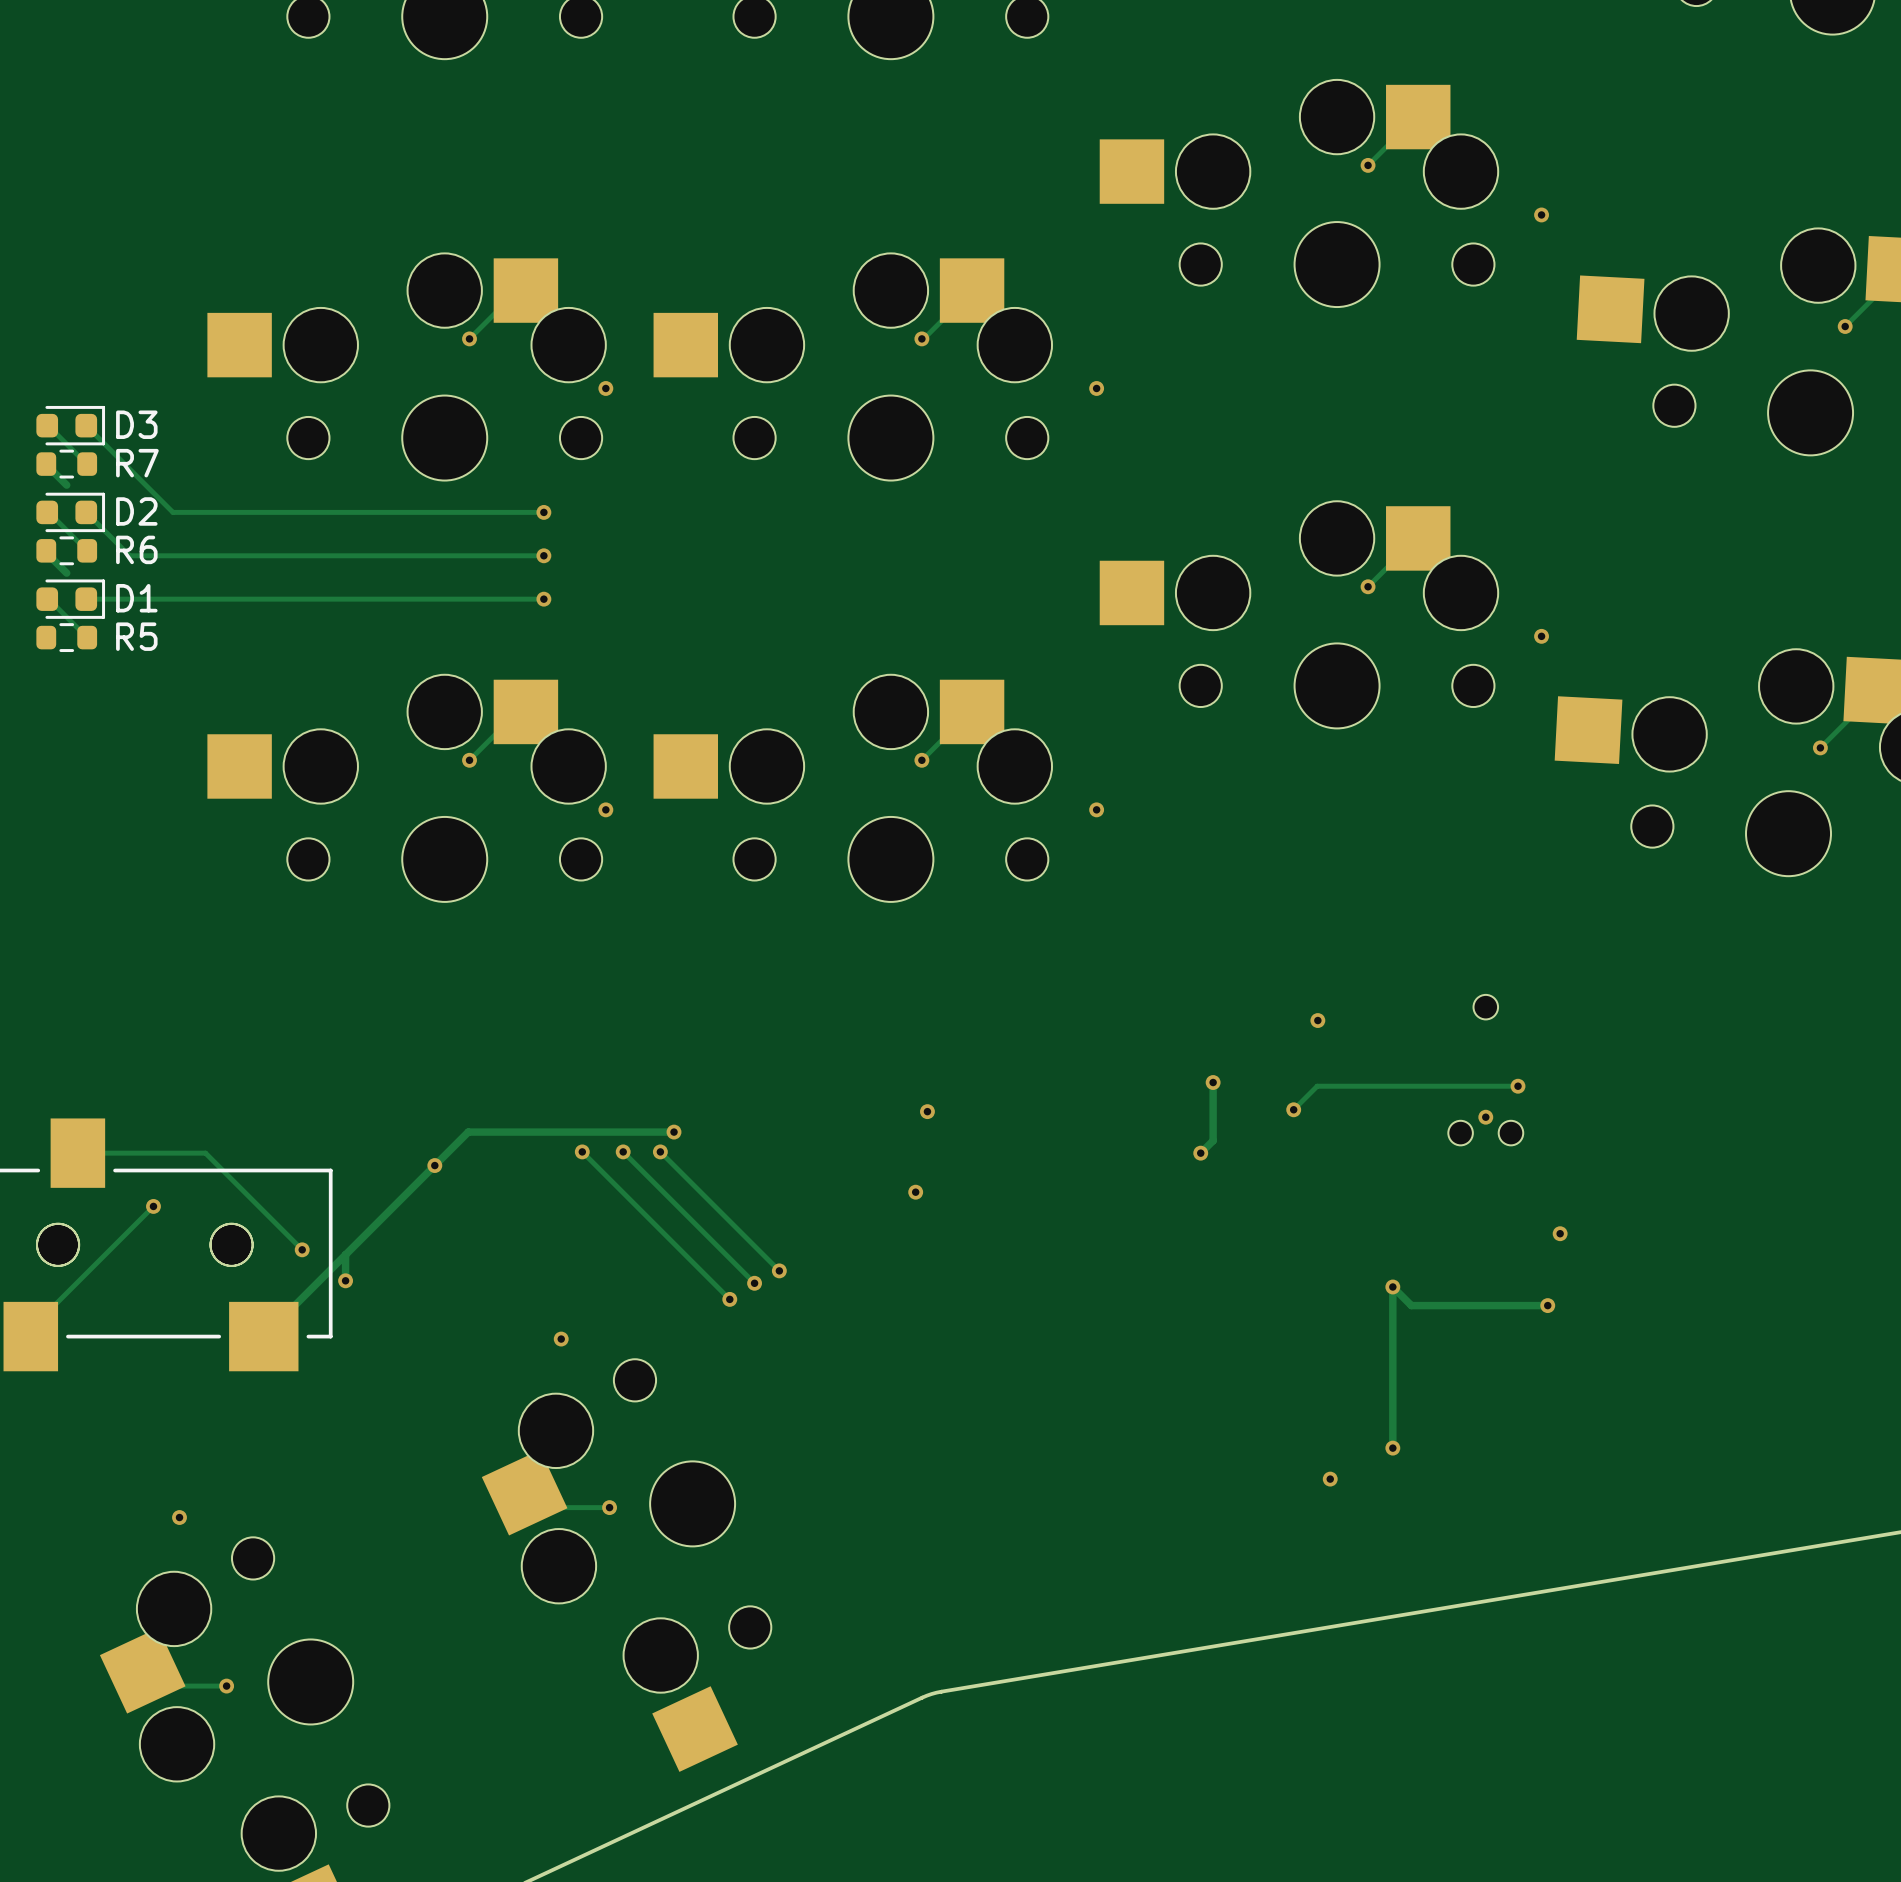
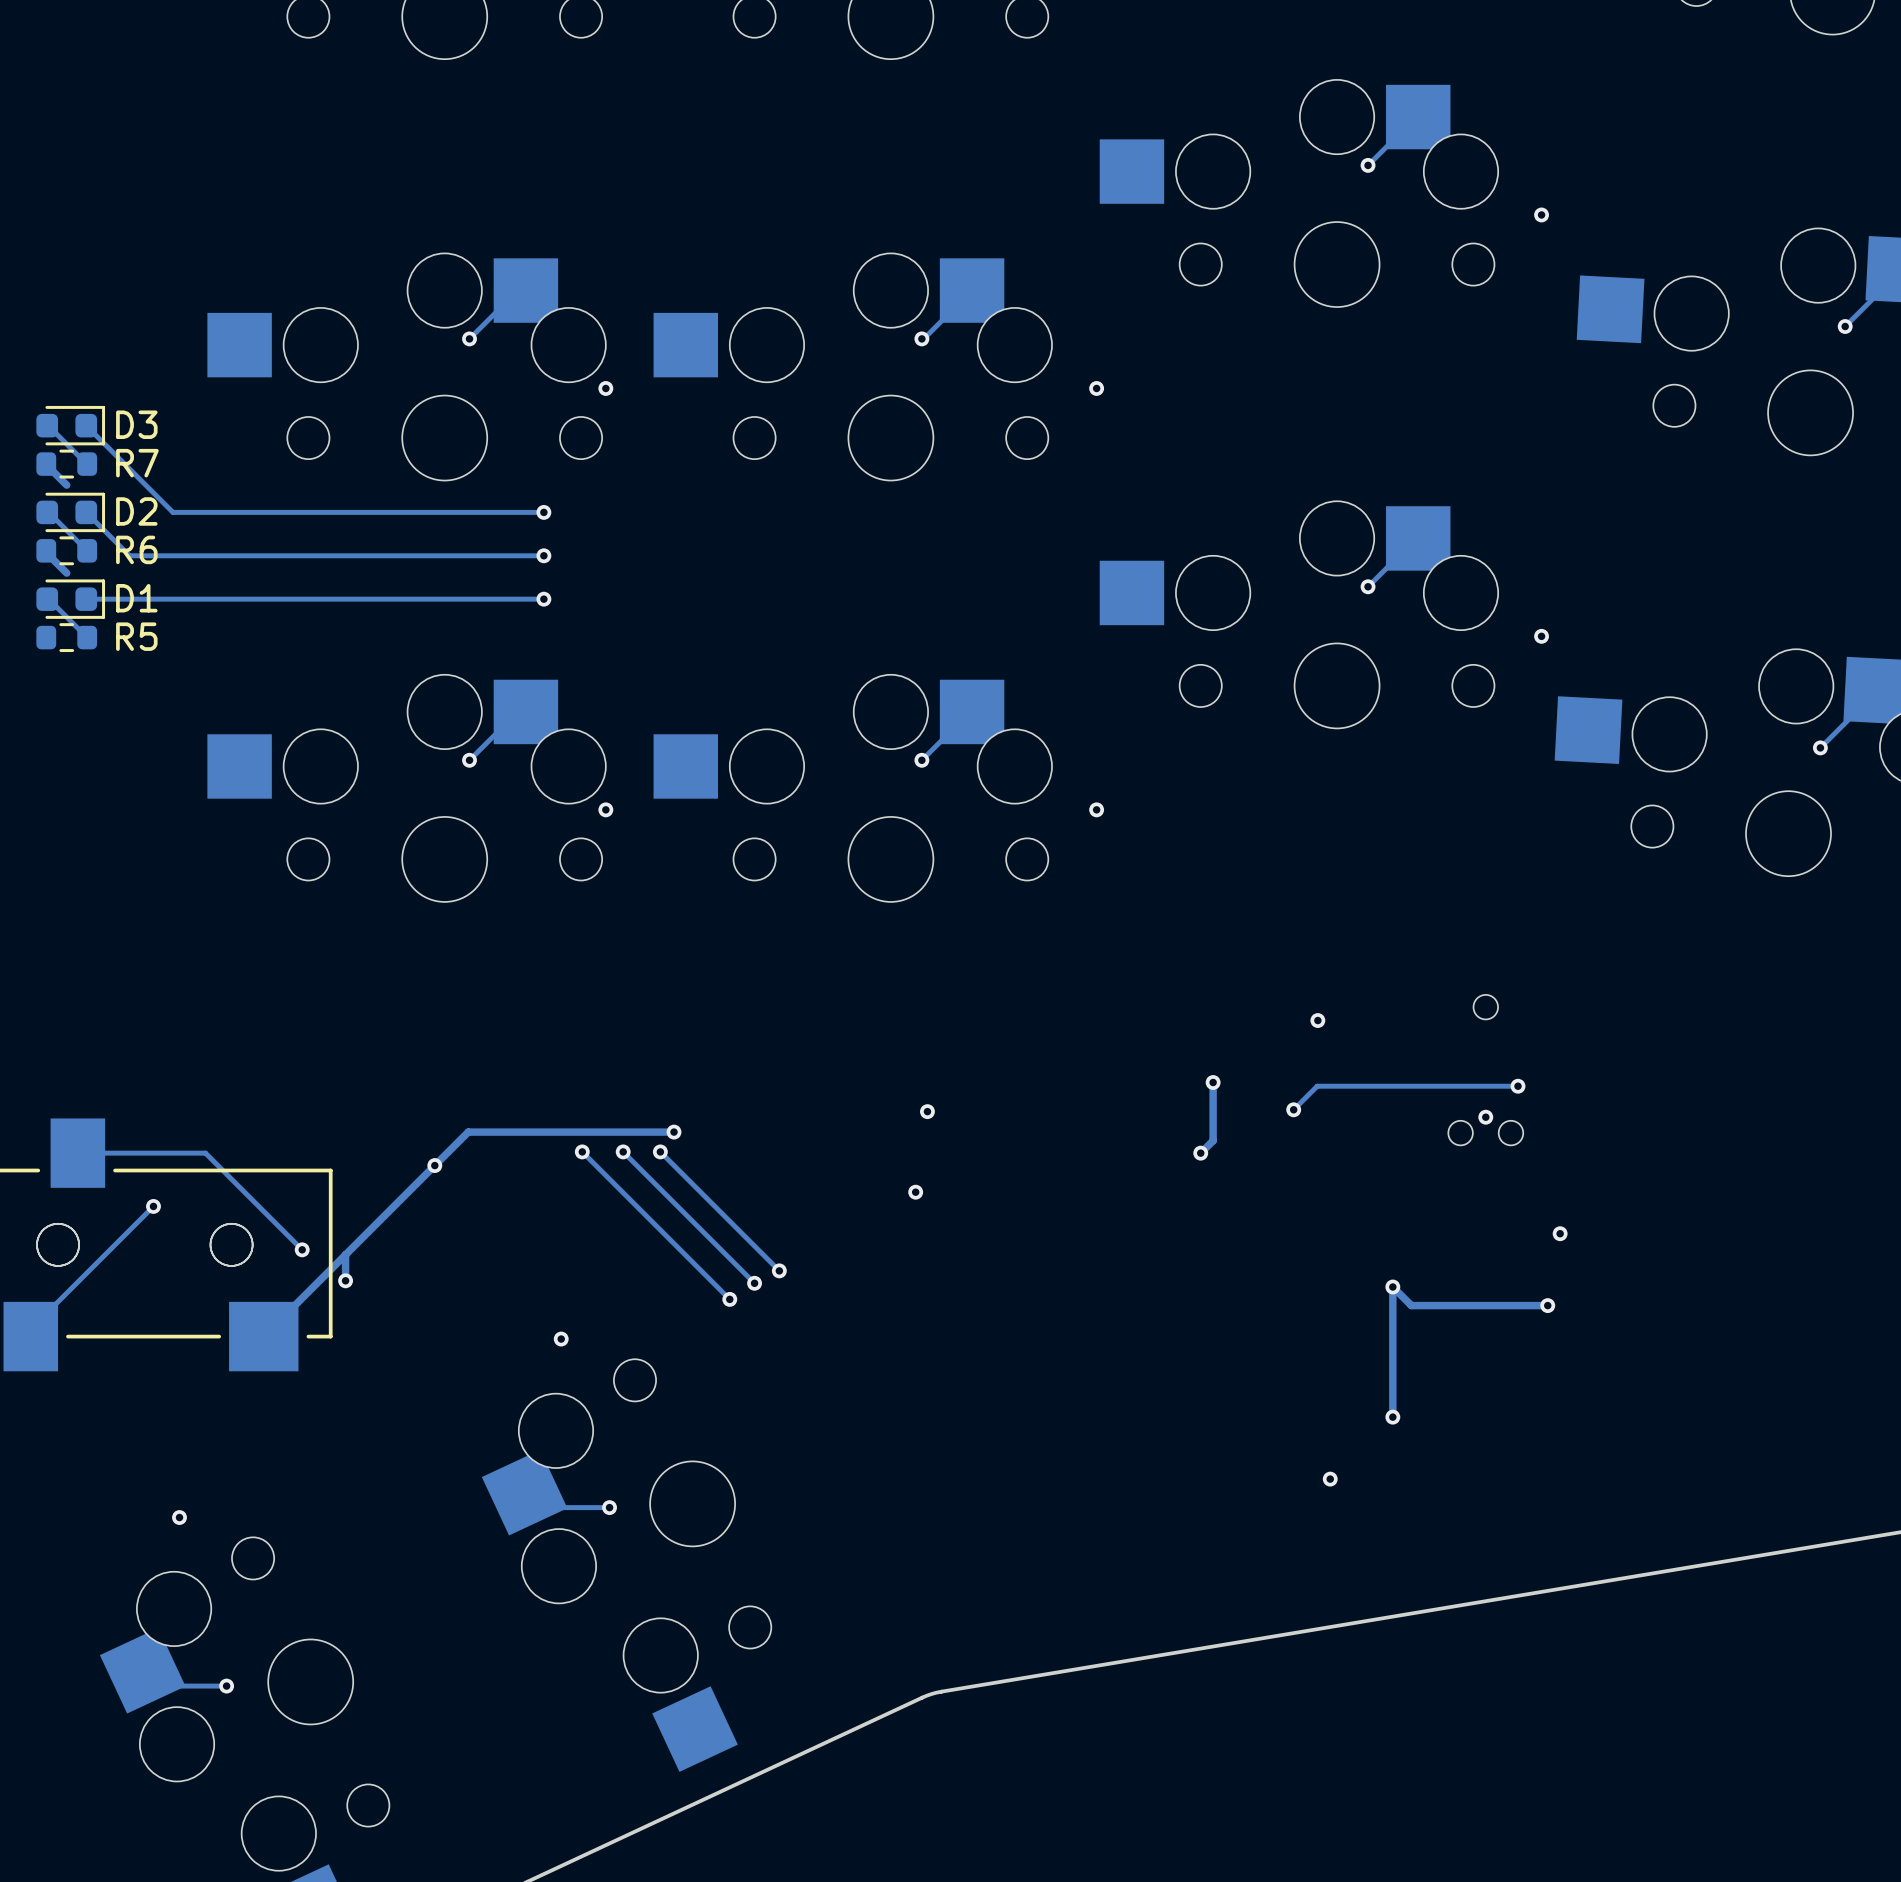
track: (1392, 1417) (1392, 1448) -> none
via position: (1392, 1448) -> (1392, 1417)

